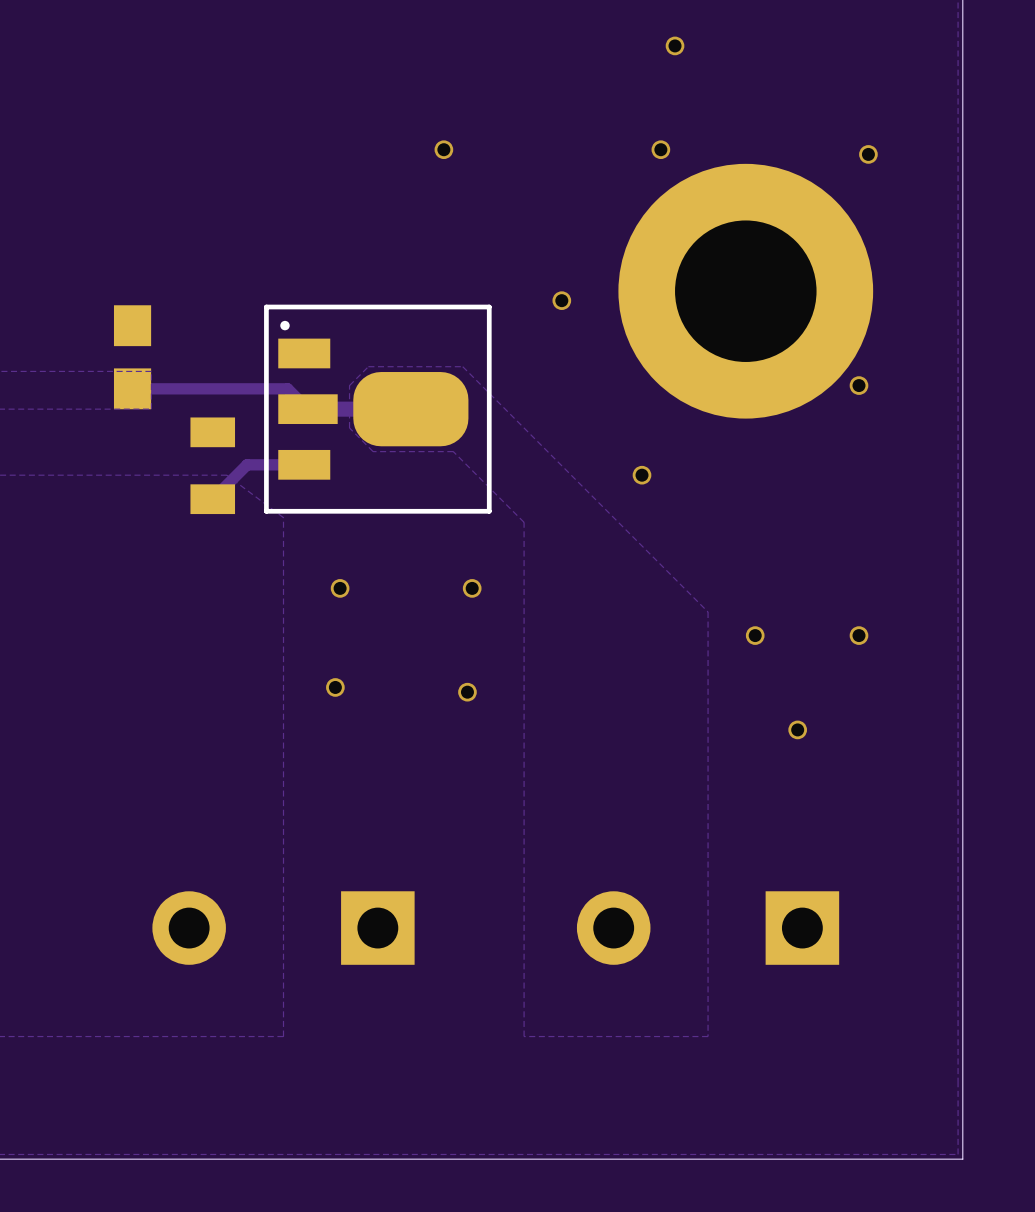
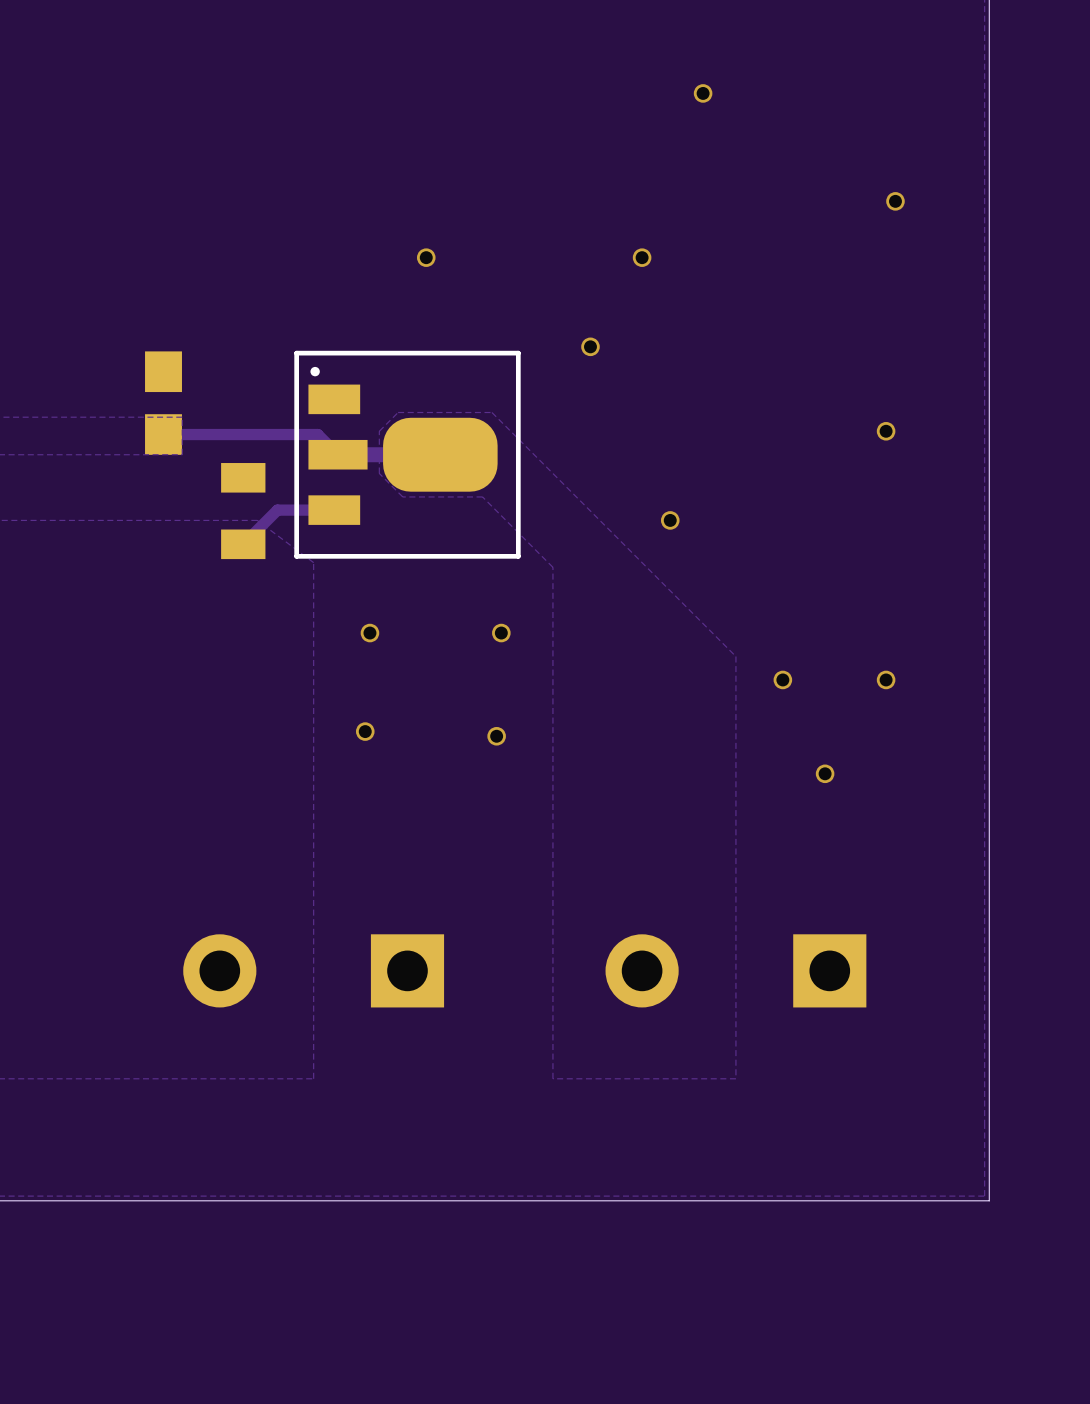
via position: (443, 149) -> (426, 257)
via position: (660, 149) -> (642, 257)
part: (745, 291) -> none

